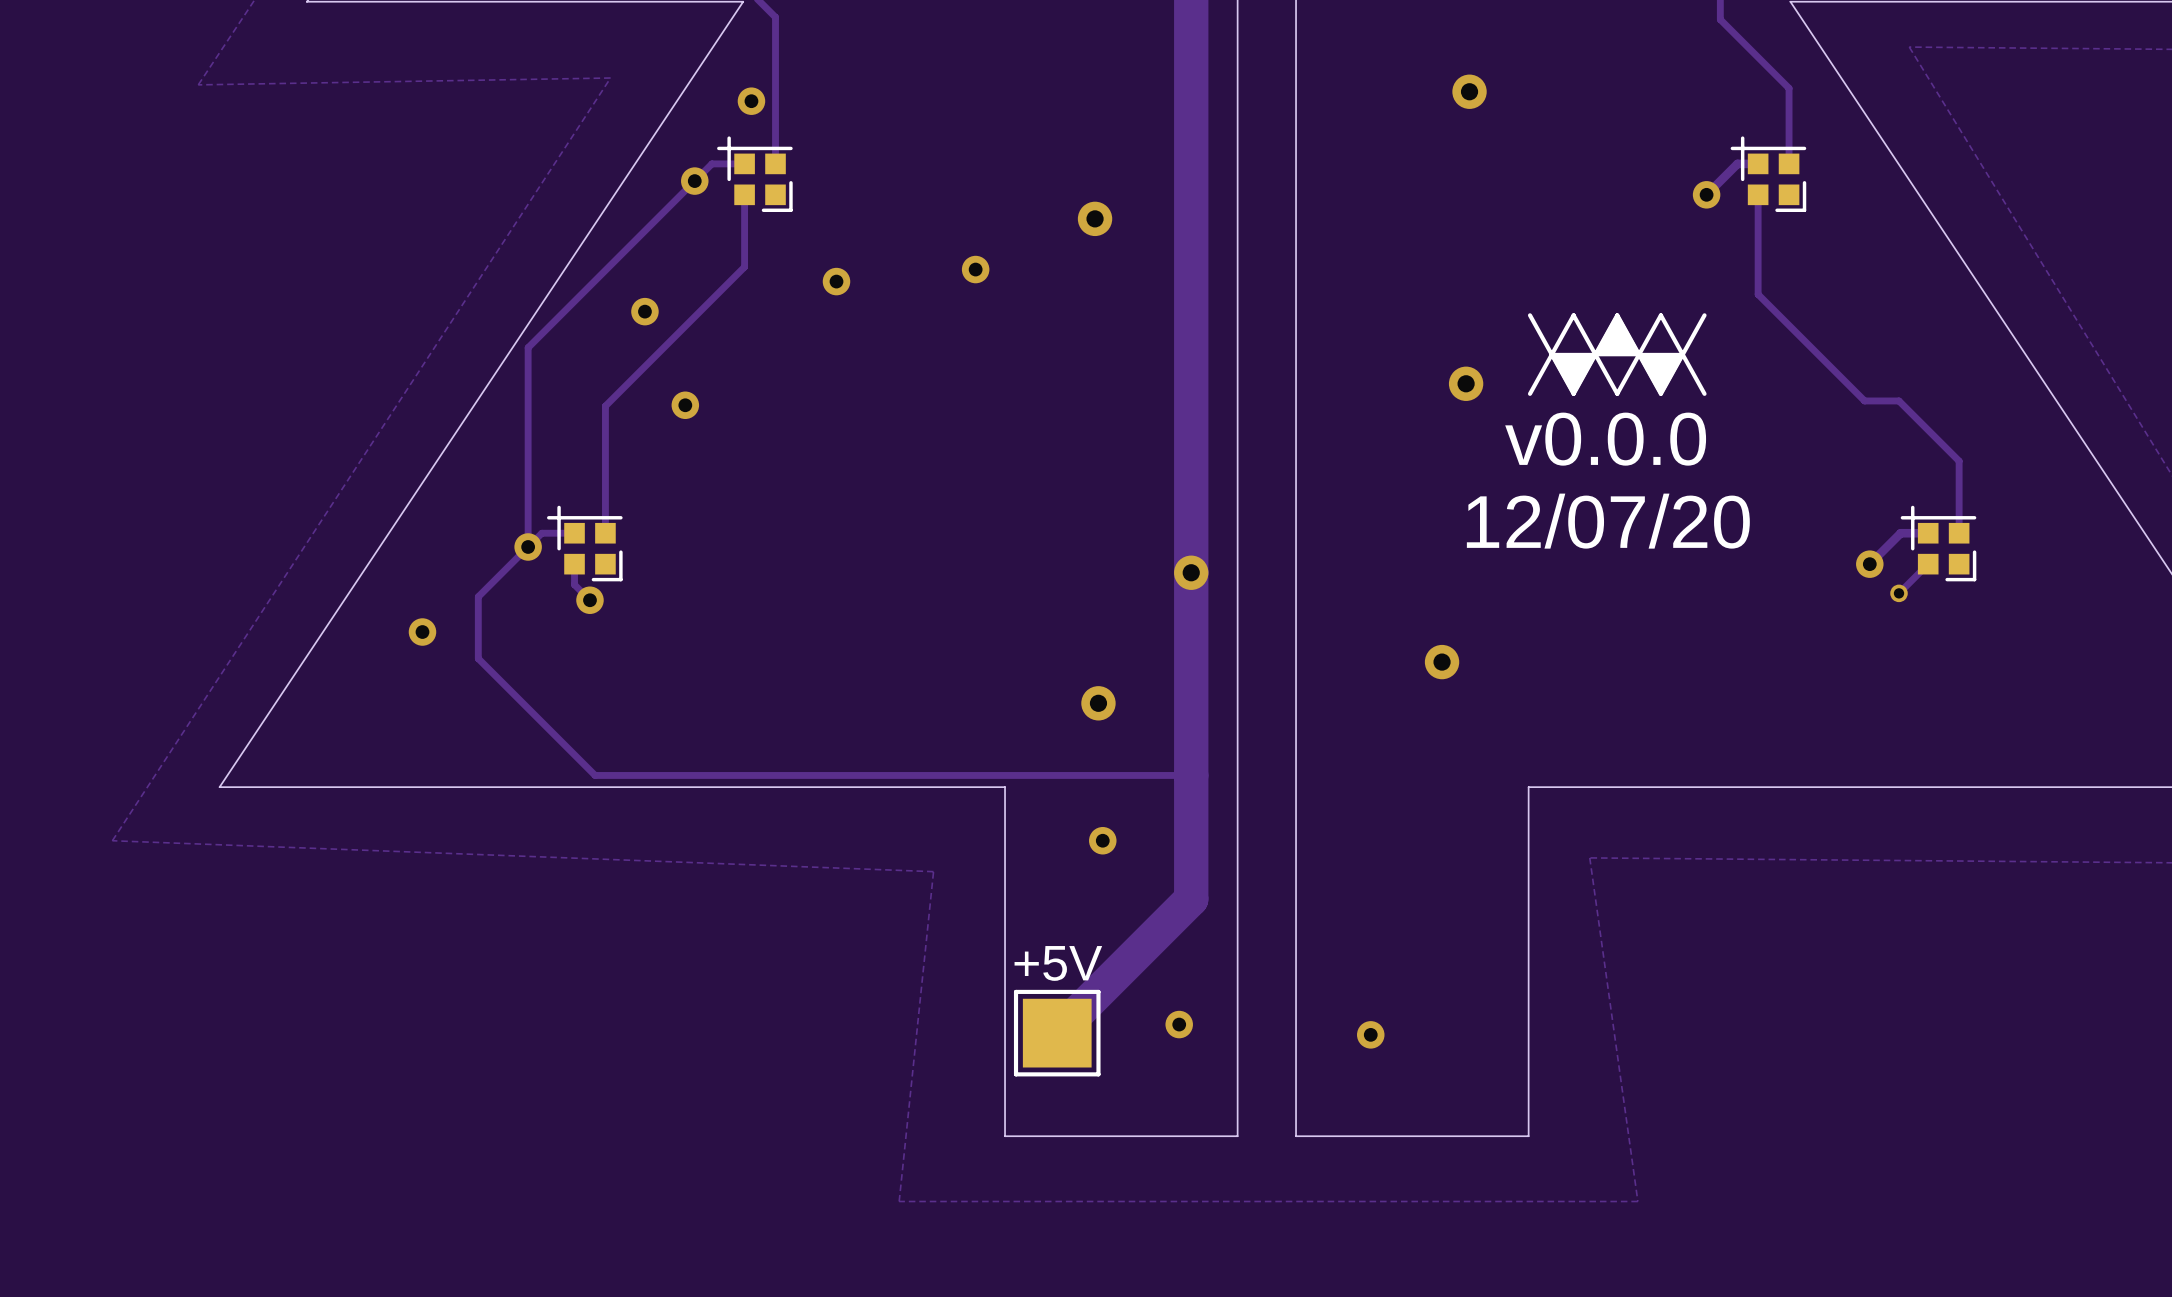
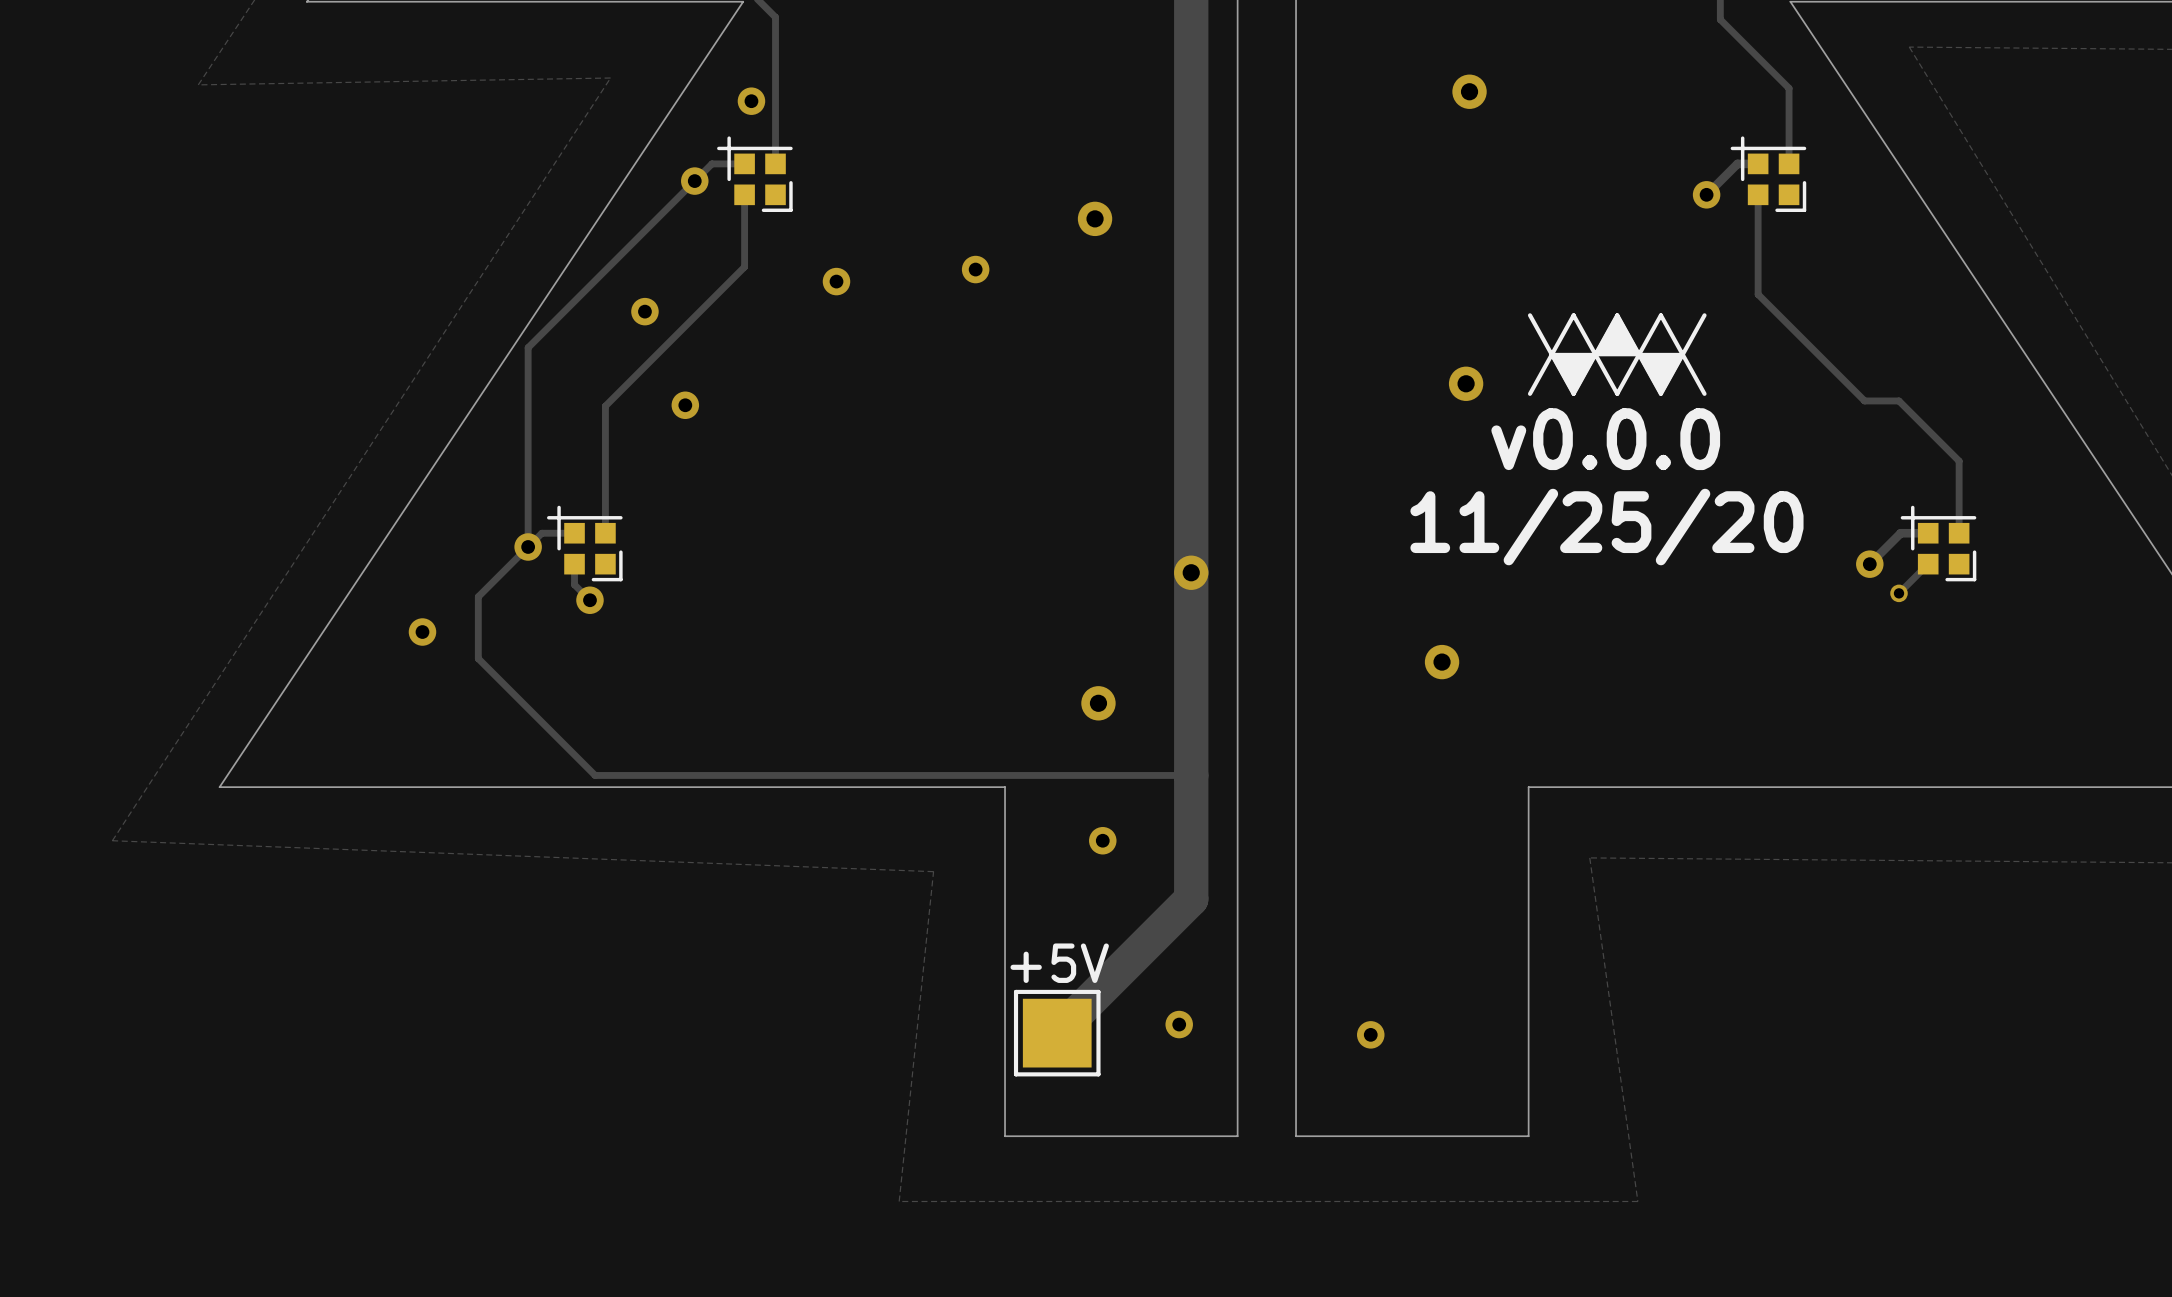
text: 12/07/20 (1608, 521) -> 11/25/20 (1606, 527)

